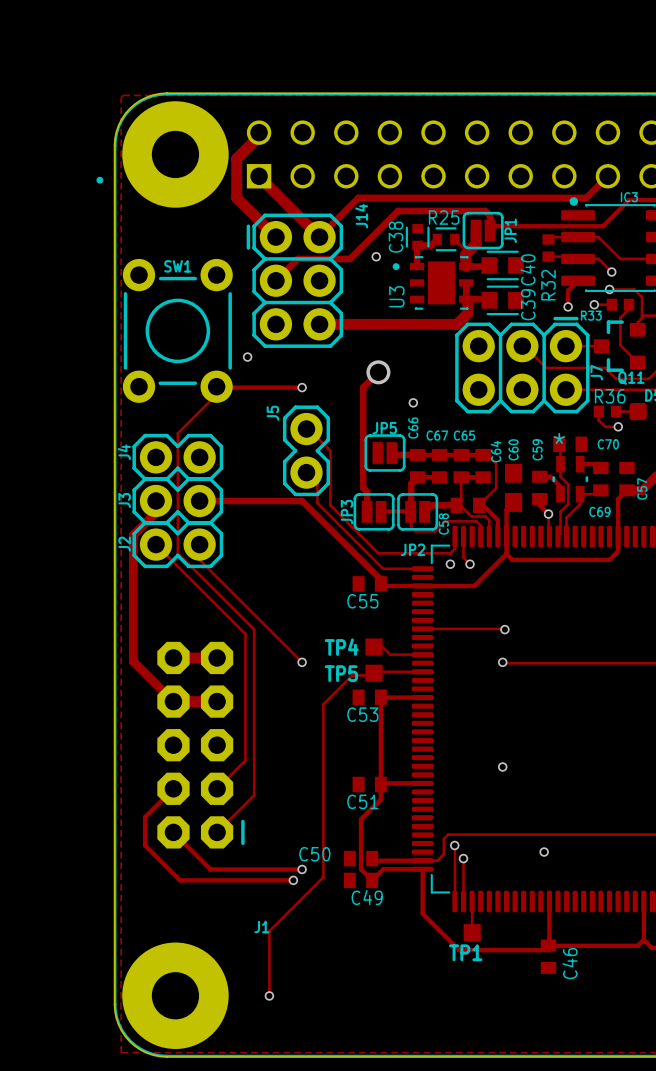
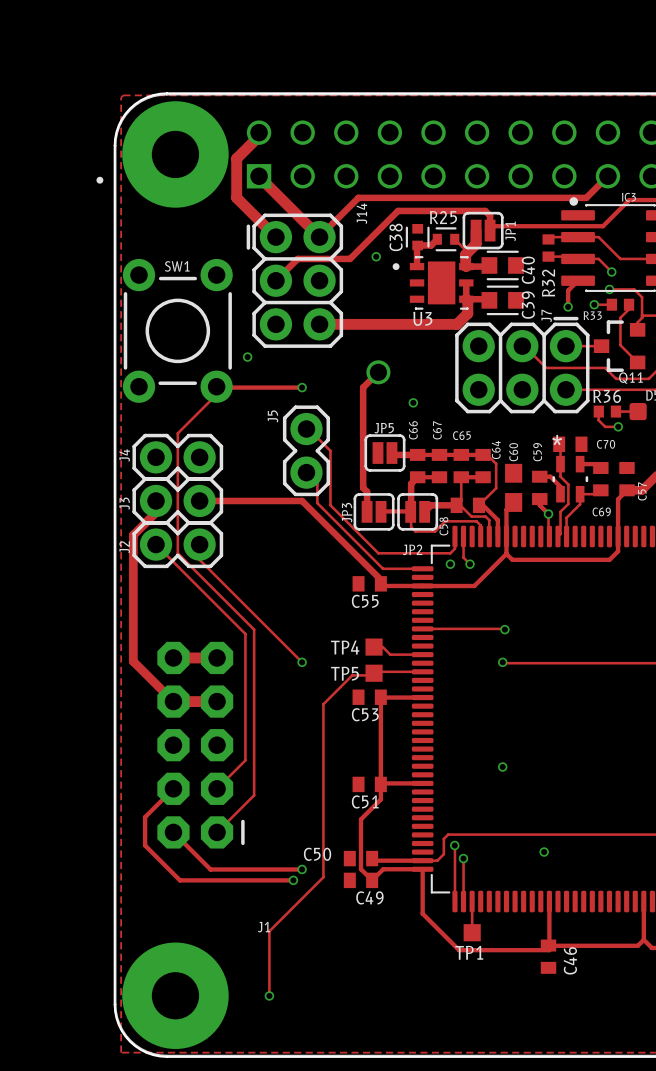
U3 name rotation: 0° (396, 296) -> 90° clockwise (422, 318)
U3 name position: U3 (396, 296) -> U3 (422, 318)
J7 name position: J7 (596, 372) -> J7 (546, 315)
C67 name rotation: 0° (437, 435) -> 90° counterclockwise (437, 430)

